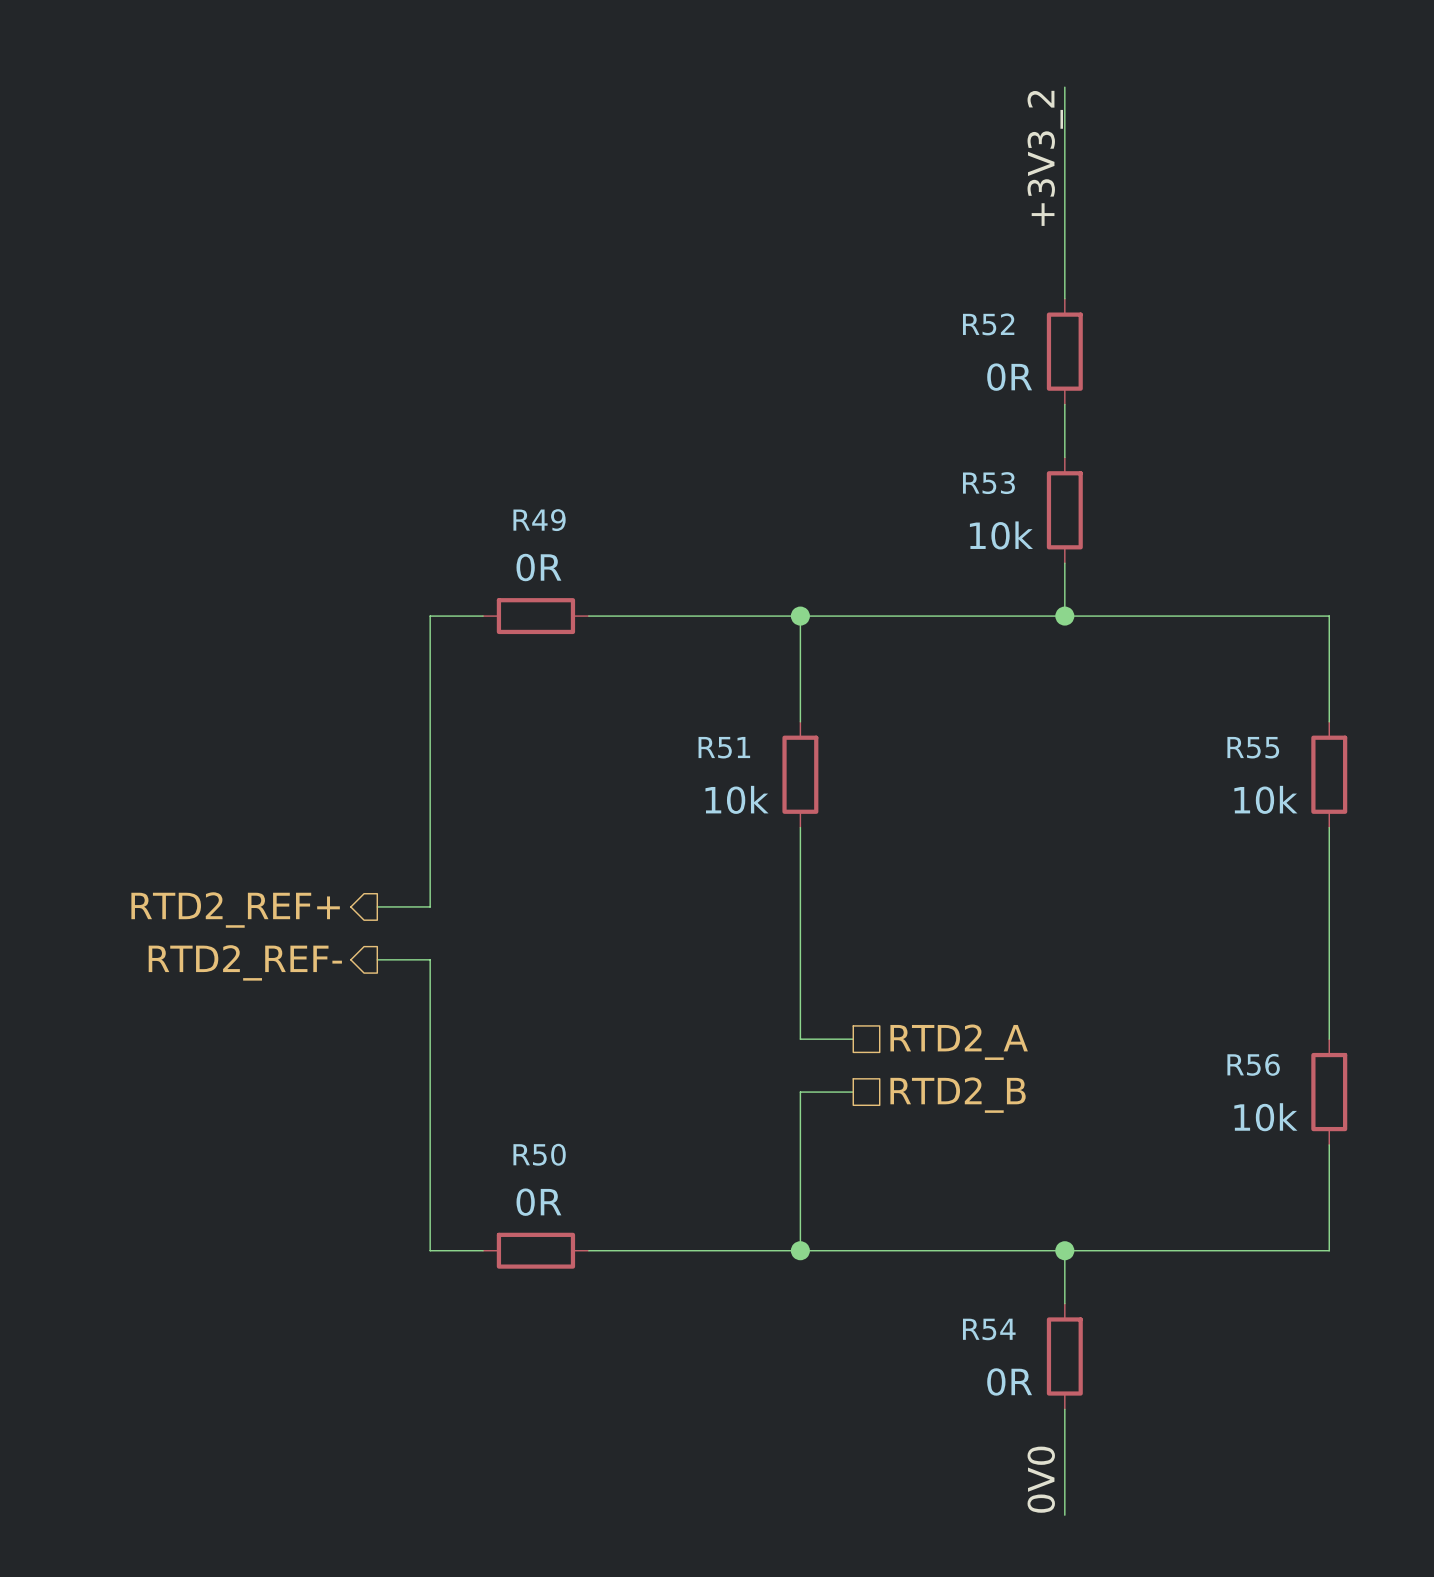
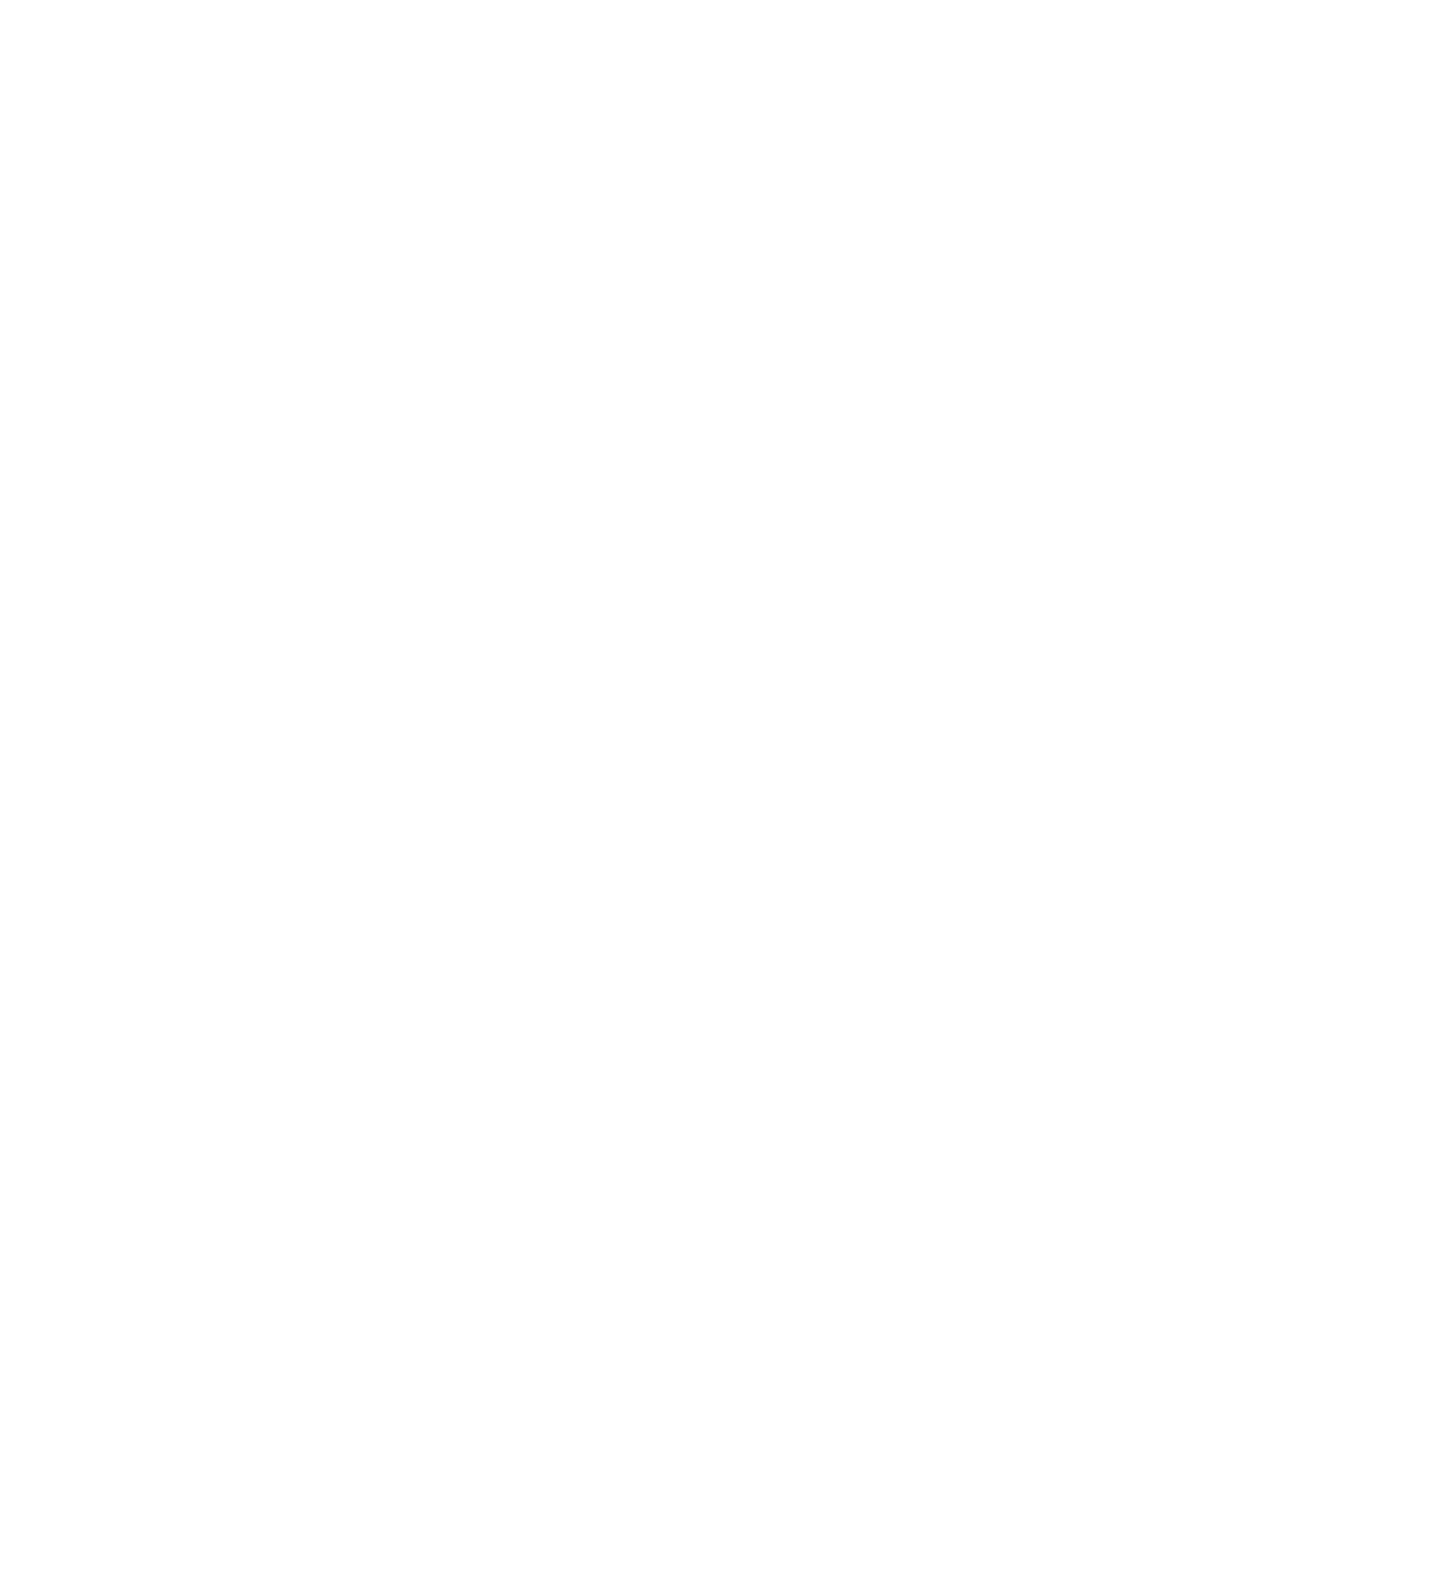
wire: (1064, 87) (1064, 298) -> none
label: +3V3_2 (1045, 158) -> none
R52: 0R (1064, 351) -> none
wire: (1064, 404) (1064, 457) -> none
R53: 10k (1064, 510) -> none
wire: (1064, 563) (1064, 616) -> none
wire: (483, 616) (430, 616) (430, 906) (377, 906) -> none
R49: 0R (535, 616) -> none
wire: (588, 616) (1329, 616) (1329, 721) -> none
wire: (800, 616) (800, 721) -> none
junction: (800, 616) -> none
junction: (1064, 616) -> none
R51: 10k (800, 774) -> none
R55: 10k (1329, 774) -> none
wire: (800, 827) (800, 1039) (853, 1039) -> none
wire: (1329, 827) (1329, 1039) -> none
hierarchical label: RTD2_REF+ (235, 910) -> none
wire: (377, 959) (430, 959) (430, 1250) (483, 1250) -> none
hierarchical label: RTD2_REF- (245, 962) -> none
hierarchical label: RTD2_A (959, 1042) -> none
wire: (853, 1092) (800, 1092) (800, 1250) -> none
R56: 10k (1329, 1092) -> none
hierarchical label: RTD2_B (958, 1095) -> none
wire: (1329, 1144) (1329, 1250) (588, 1250) -> none
R50: 0R (535, 1250) -> none
junction: (800, 1250) -> none
wire: (1064, 1250) (1064, 1303) -> none
junction: (1064, 1250) -> none
R54: 0R (1064, 1356) -> none
wire: (1064, 1409) (1064, 1515) -> none
label: 0V0 (1041, 1479) -> none

